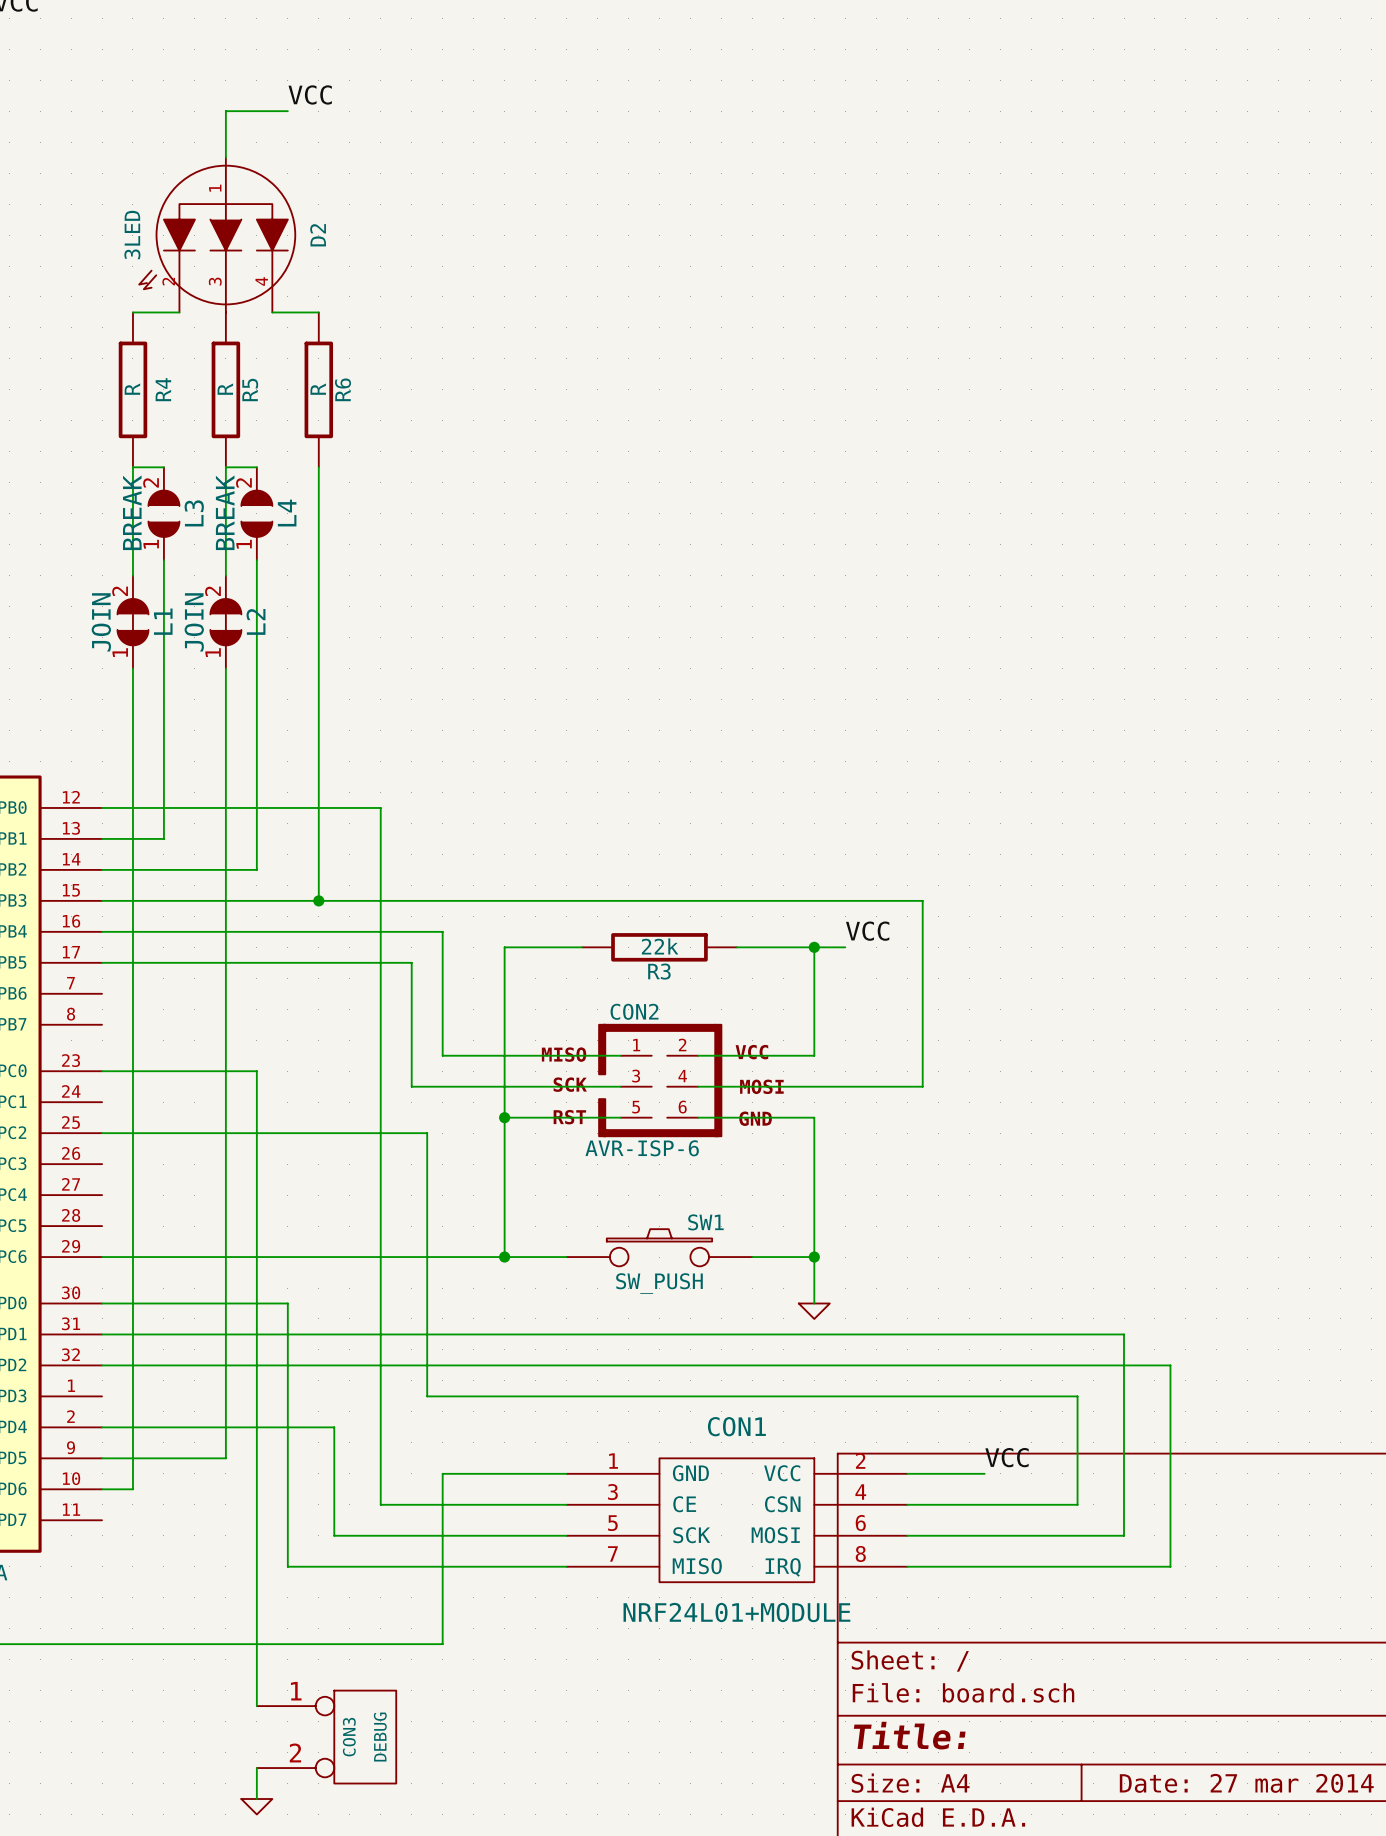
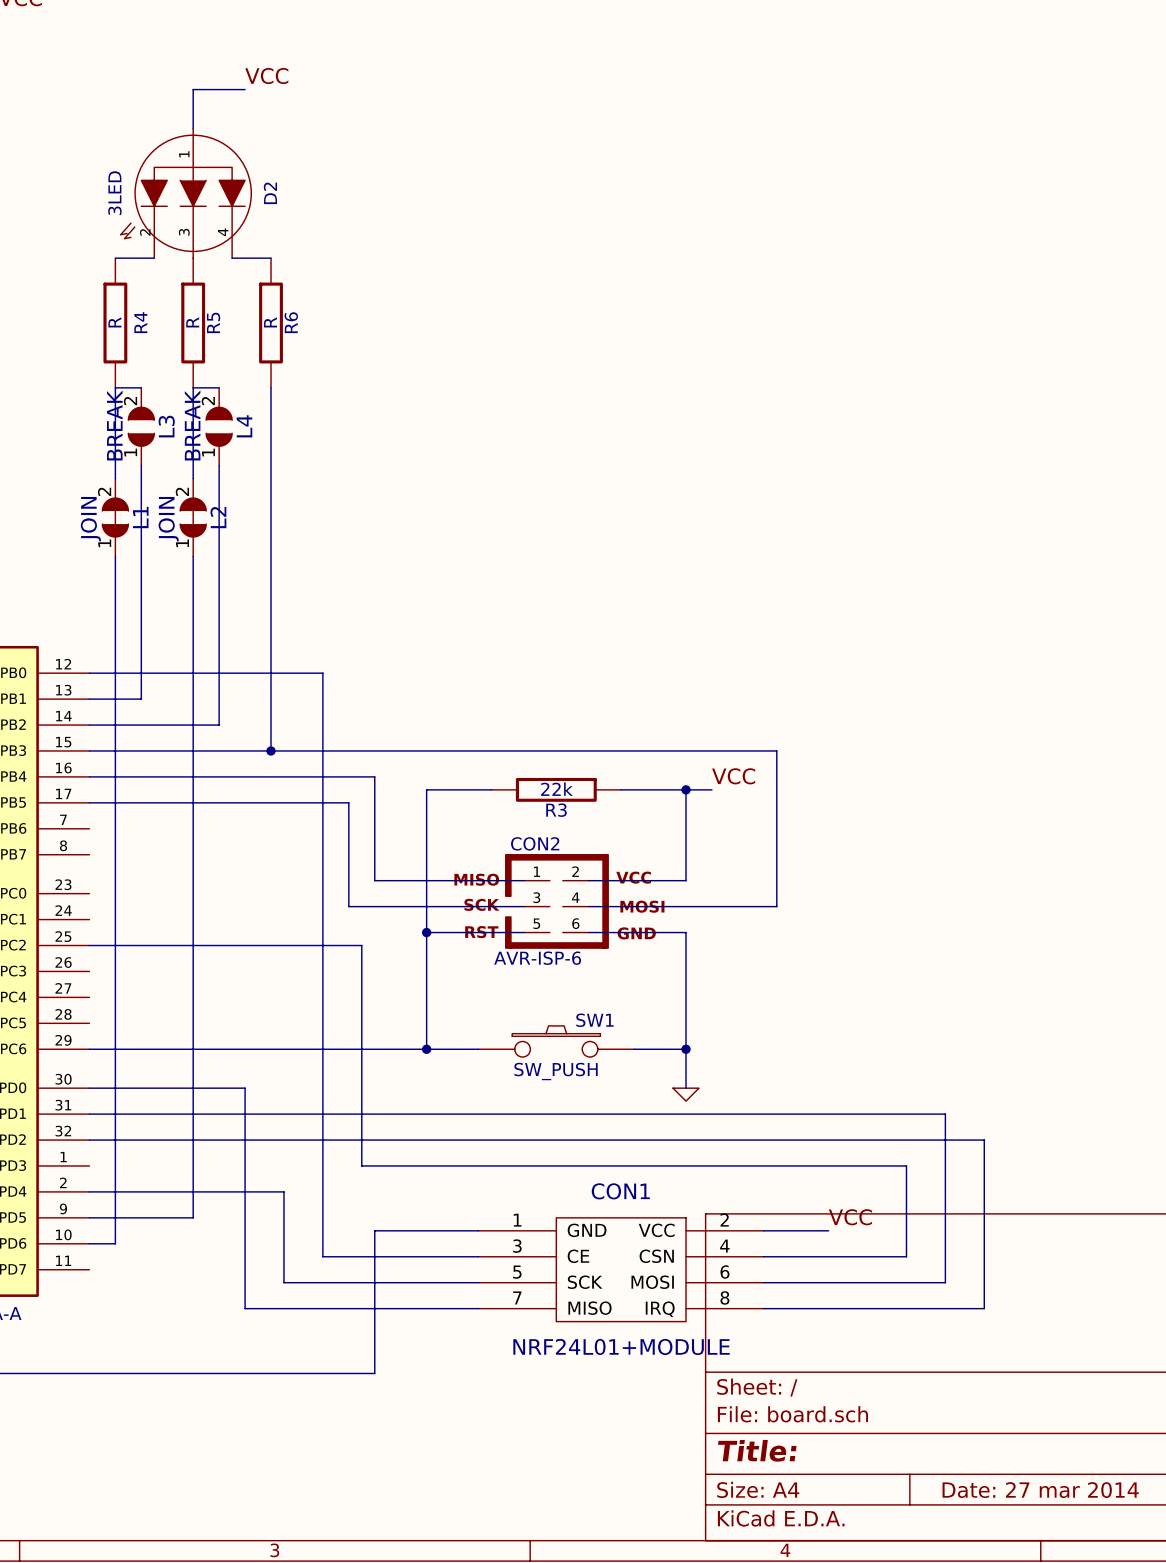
wire: (102, 1071) (256, 1071) (256, 1706) -> none
CON3: DEBUG (326, 1737) -> none
wire: (256, 1768) (256, 1799) -> none
power symbol: (256, 1806) -> none

